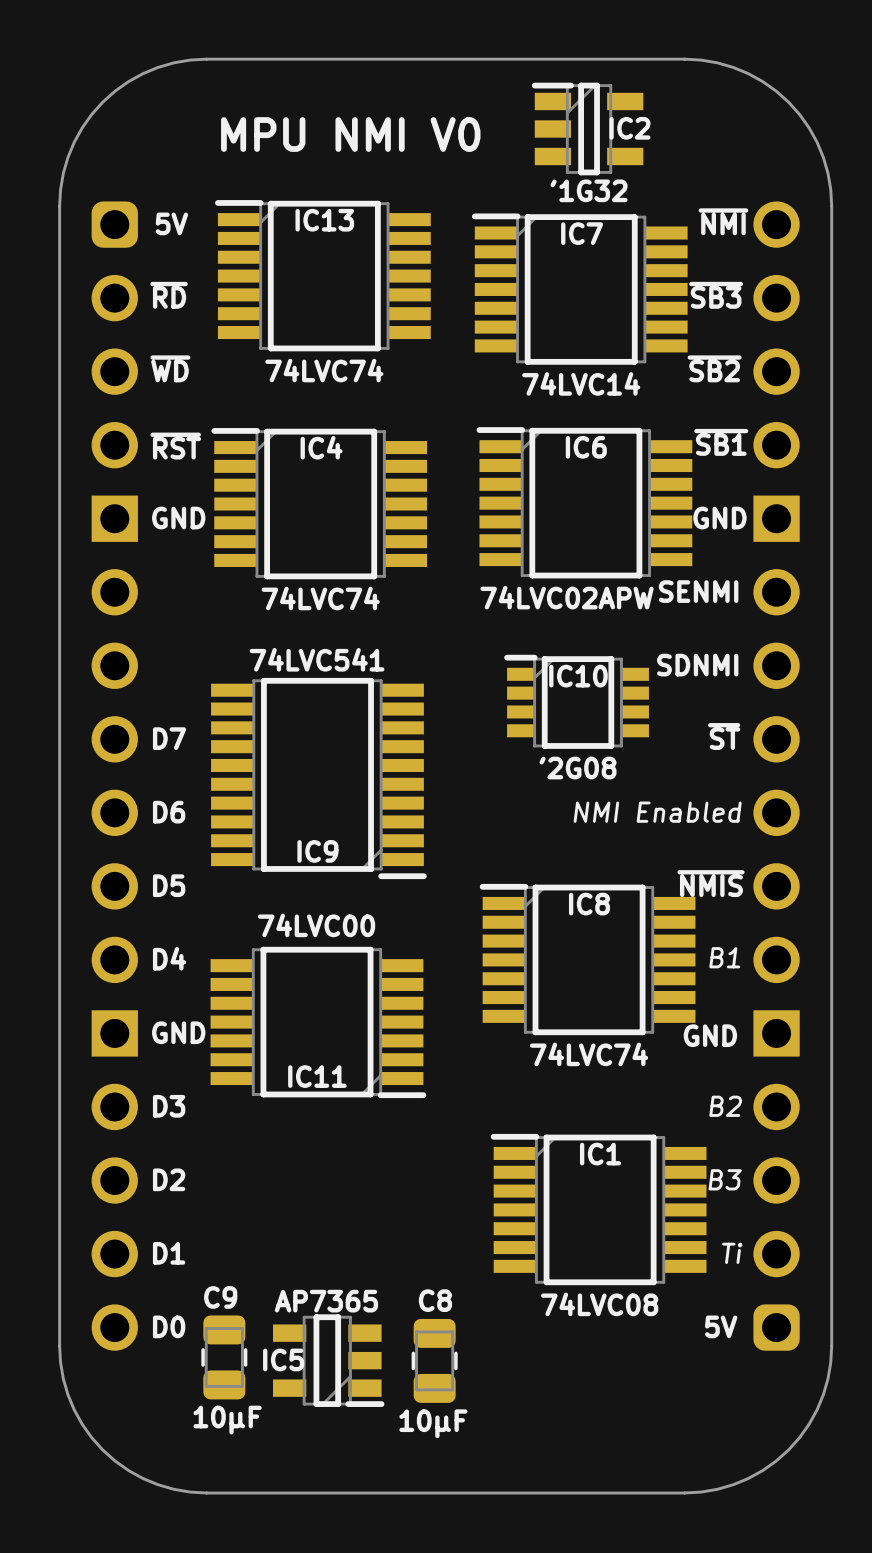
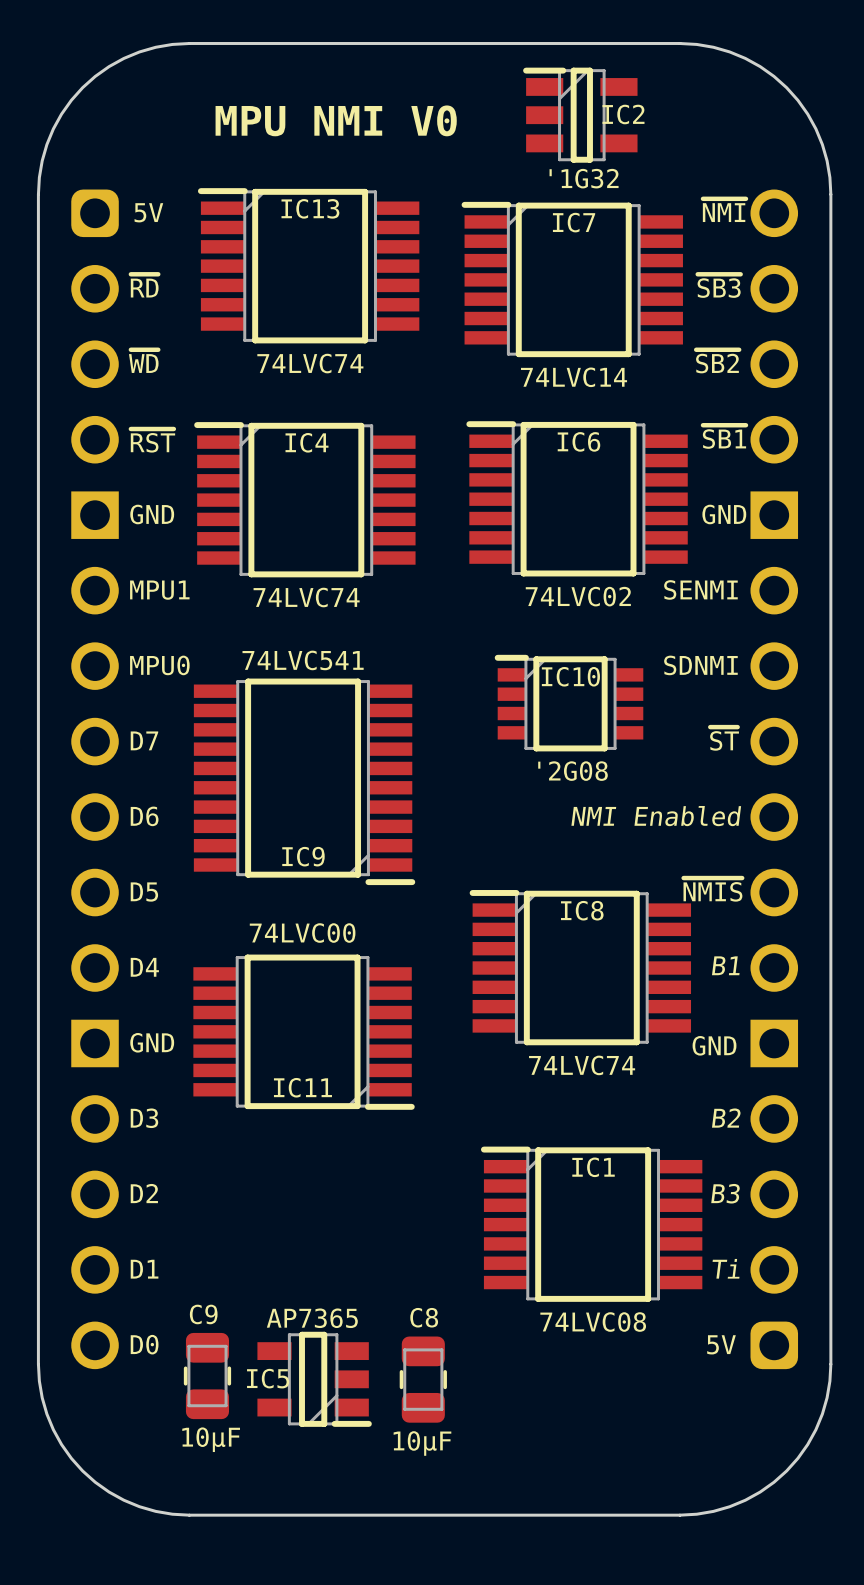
text: none -> MPU1 (159, 590)
IC6 text: 74LVC02APW (566, 597) -> none
IC6 text: none -> 74LVC02 (578, 596)
text: none -> MPU0 (159, 665)

